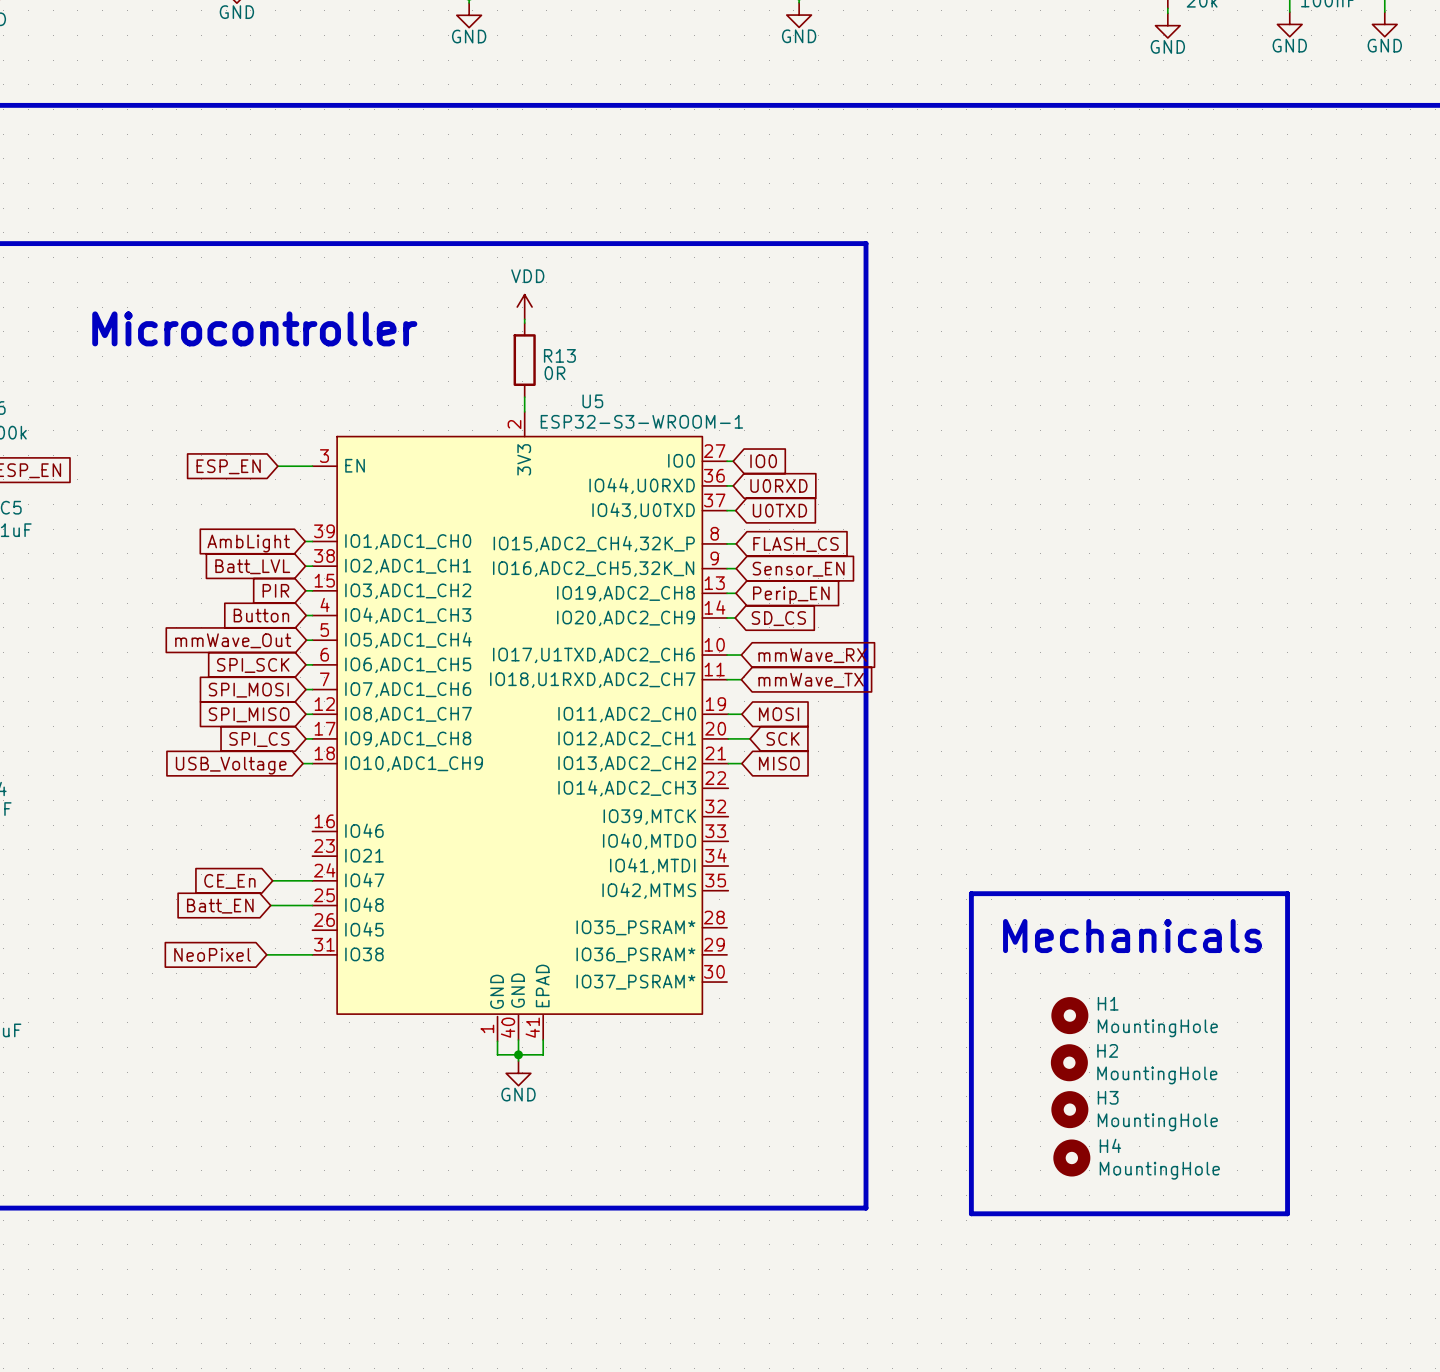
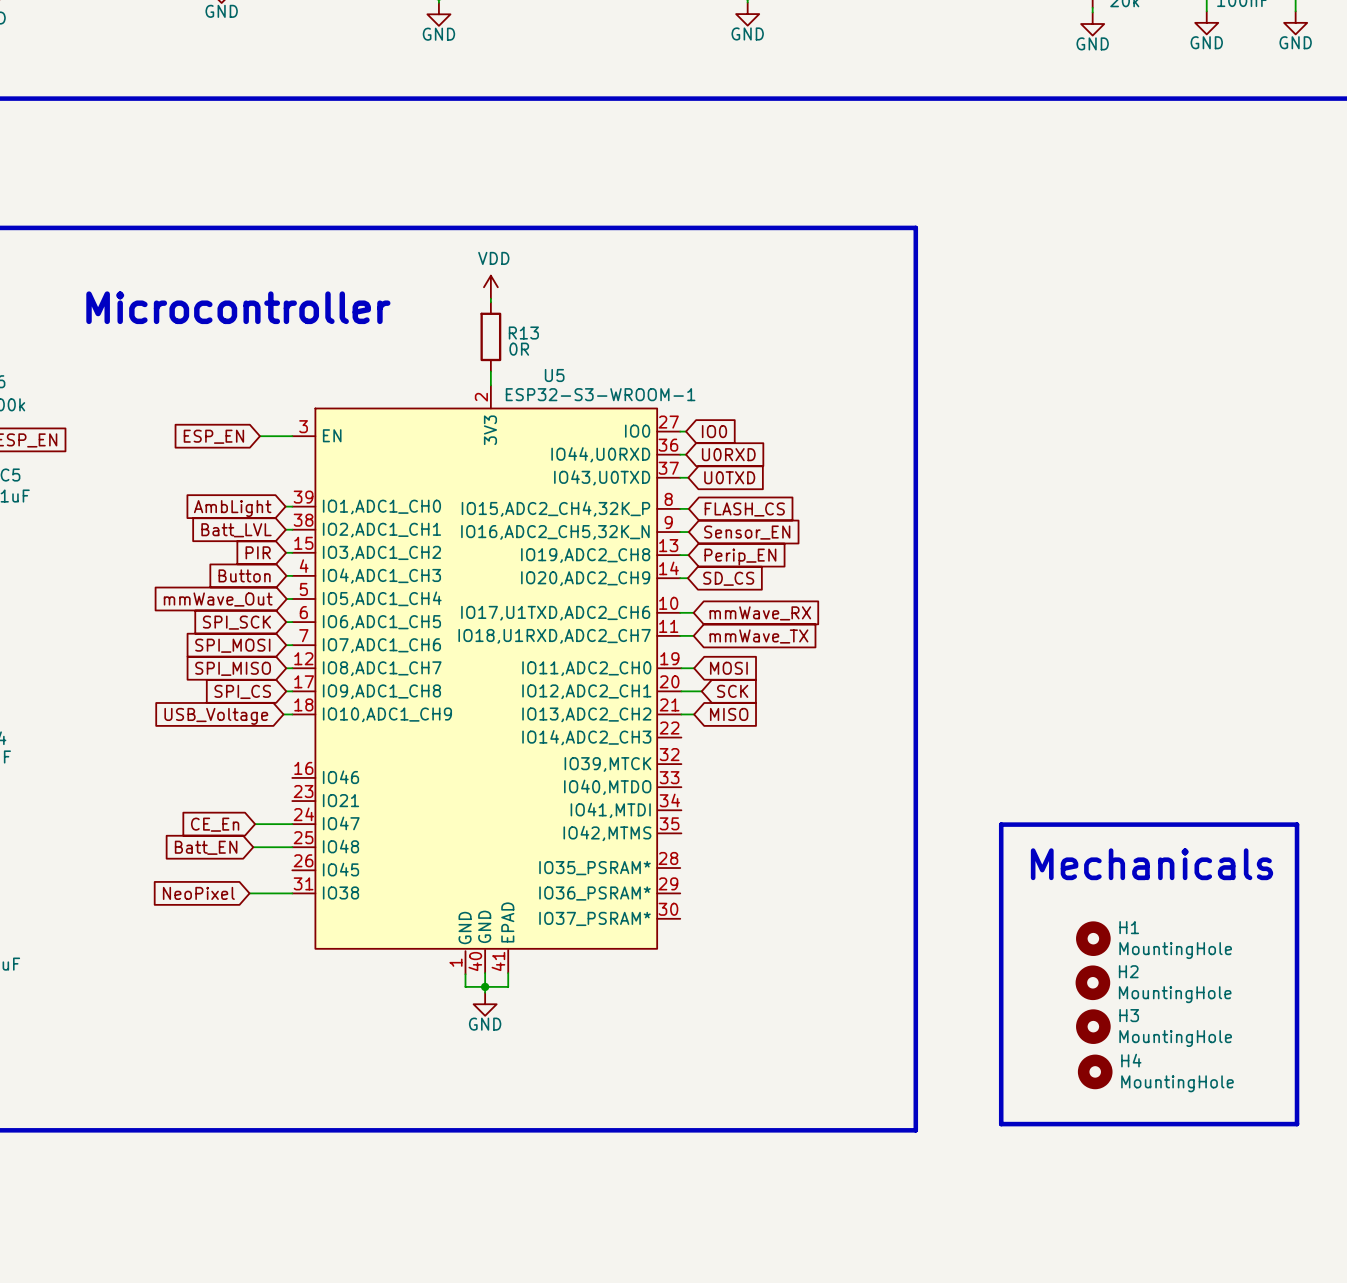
line: (866, 243) (866, 1208) -> (810, 227) (915, 227) (915, 1130) (810, 1130)
line: (971, 893) (1287, 893) (1287, 1213) (971, 1213) (971, 893) -> (1001, 824) (1297, 824) (1297, 1124) (1001, 1124) (1001, 824)
text position: Mechanicals (1132, 936) -> Mechanicals (1151, 864)
H1 position: (1069, 1015) -> (1093, 938)
H2 position: (1069, 1062) -> (1092, 982)
H3 position: (1069, 1109) -> (1093, 1026)
H4 position: (1071, 1158) -> (1095, 1071)

